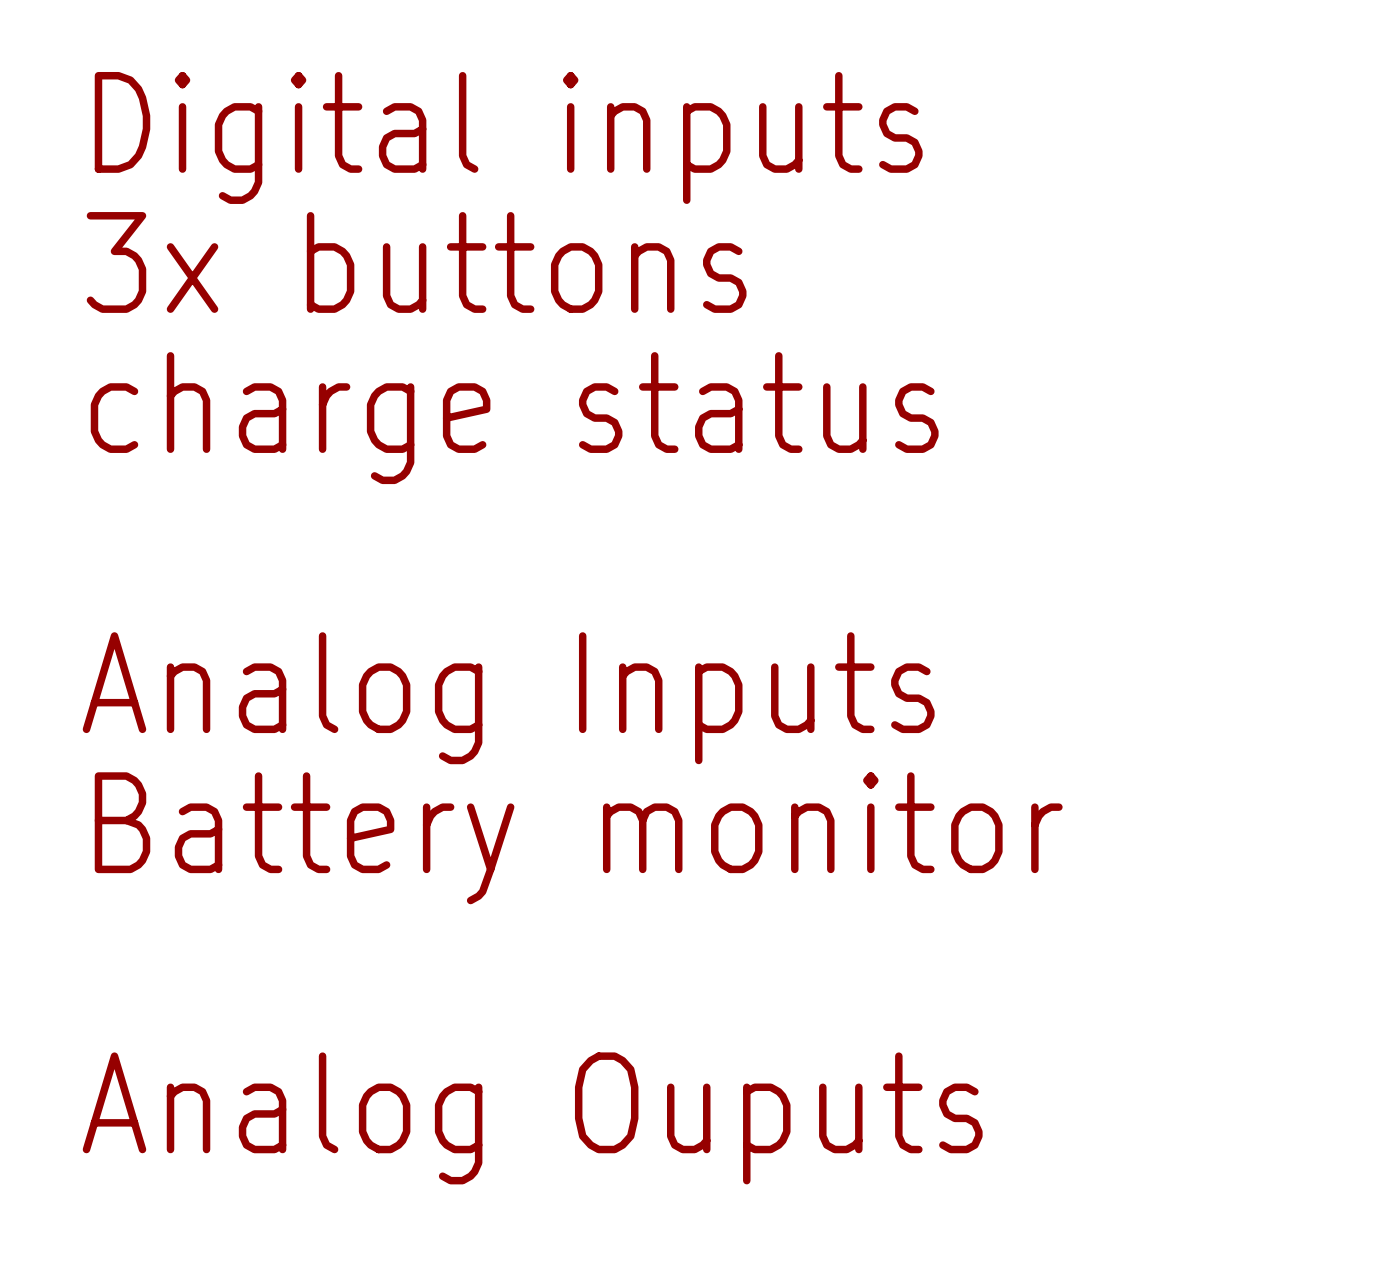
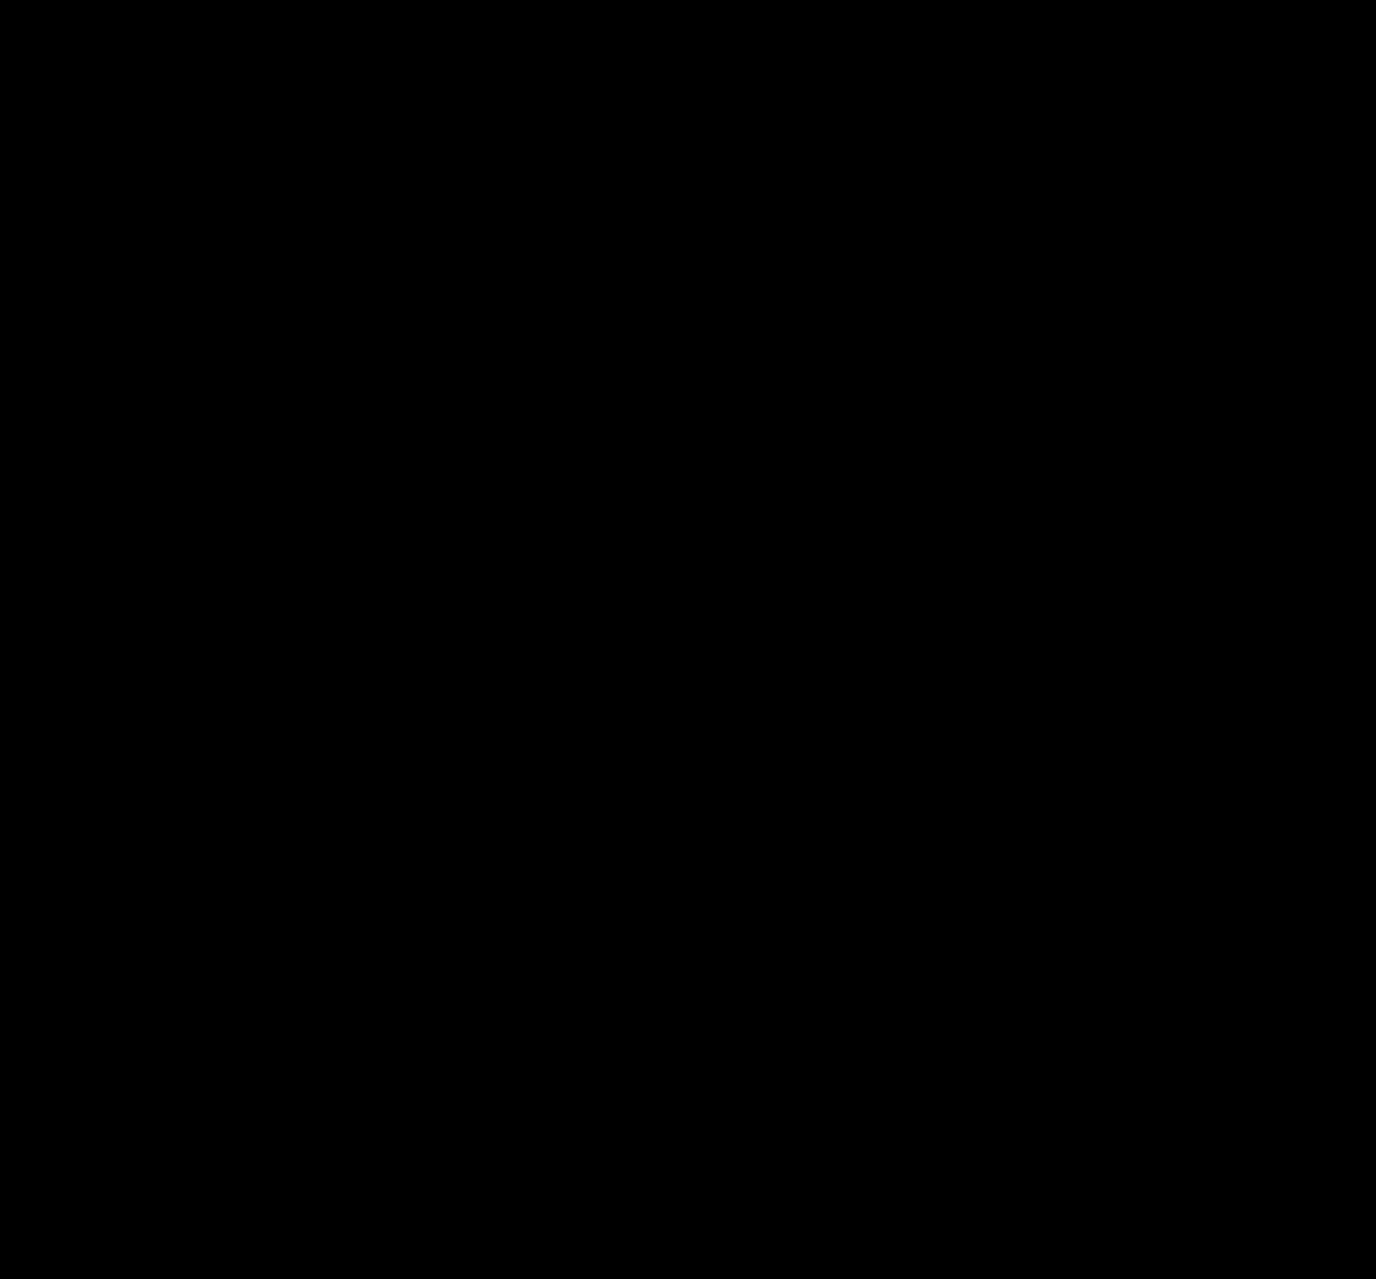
text: Digital inputs (508, 137) -> none
text: 3x buttons (416, 262) -> none
text: charge status (514, 418) -> none
text: Analog Inputs (508, 698) -> none
text: Battery monitor (578, 838) -> none
text: Analog Ouputs (532, 1118) -> none

